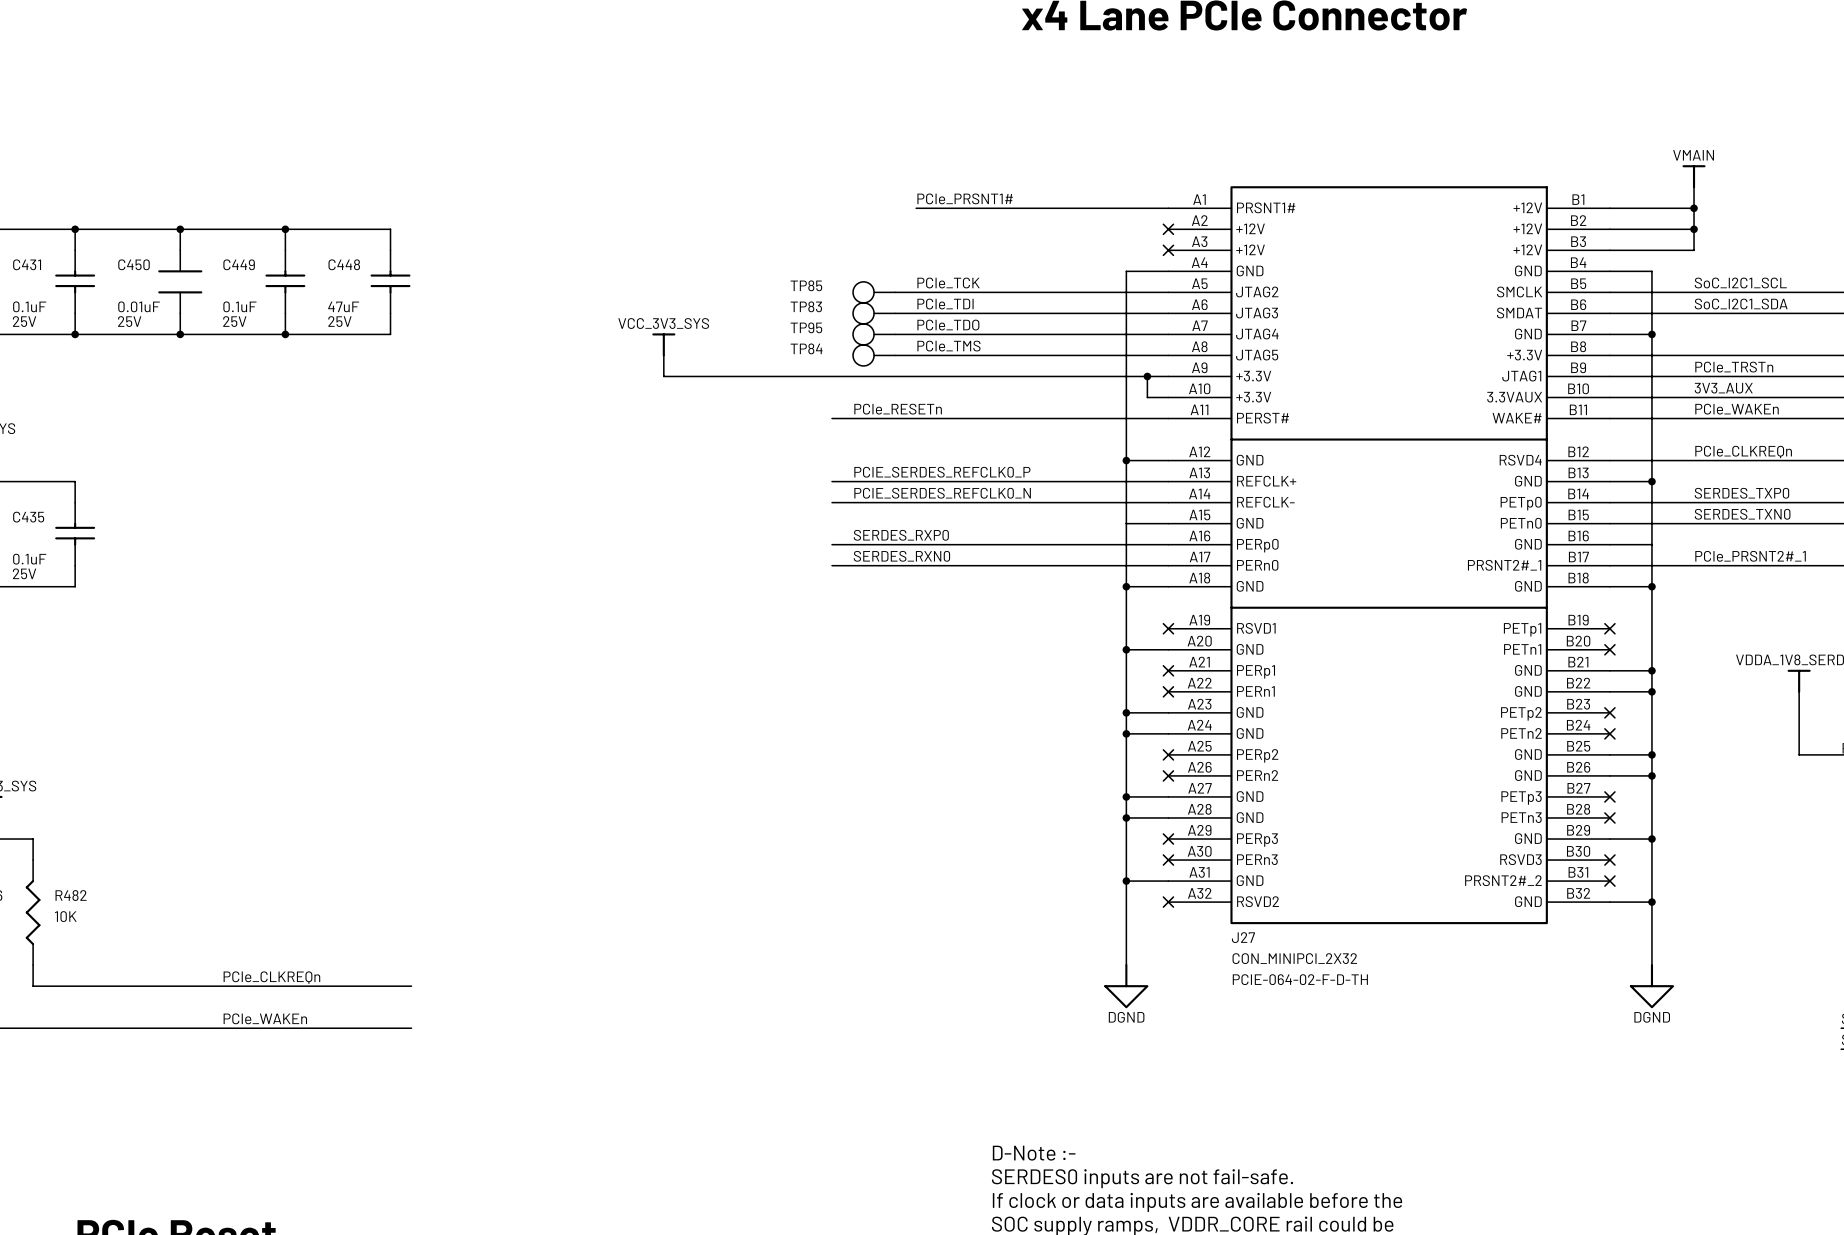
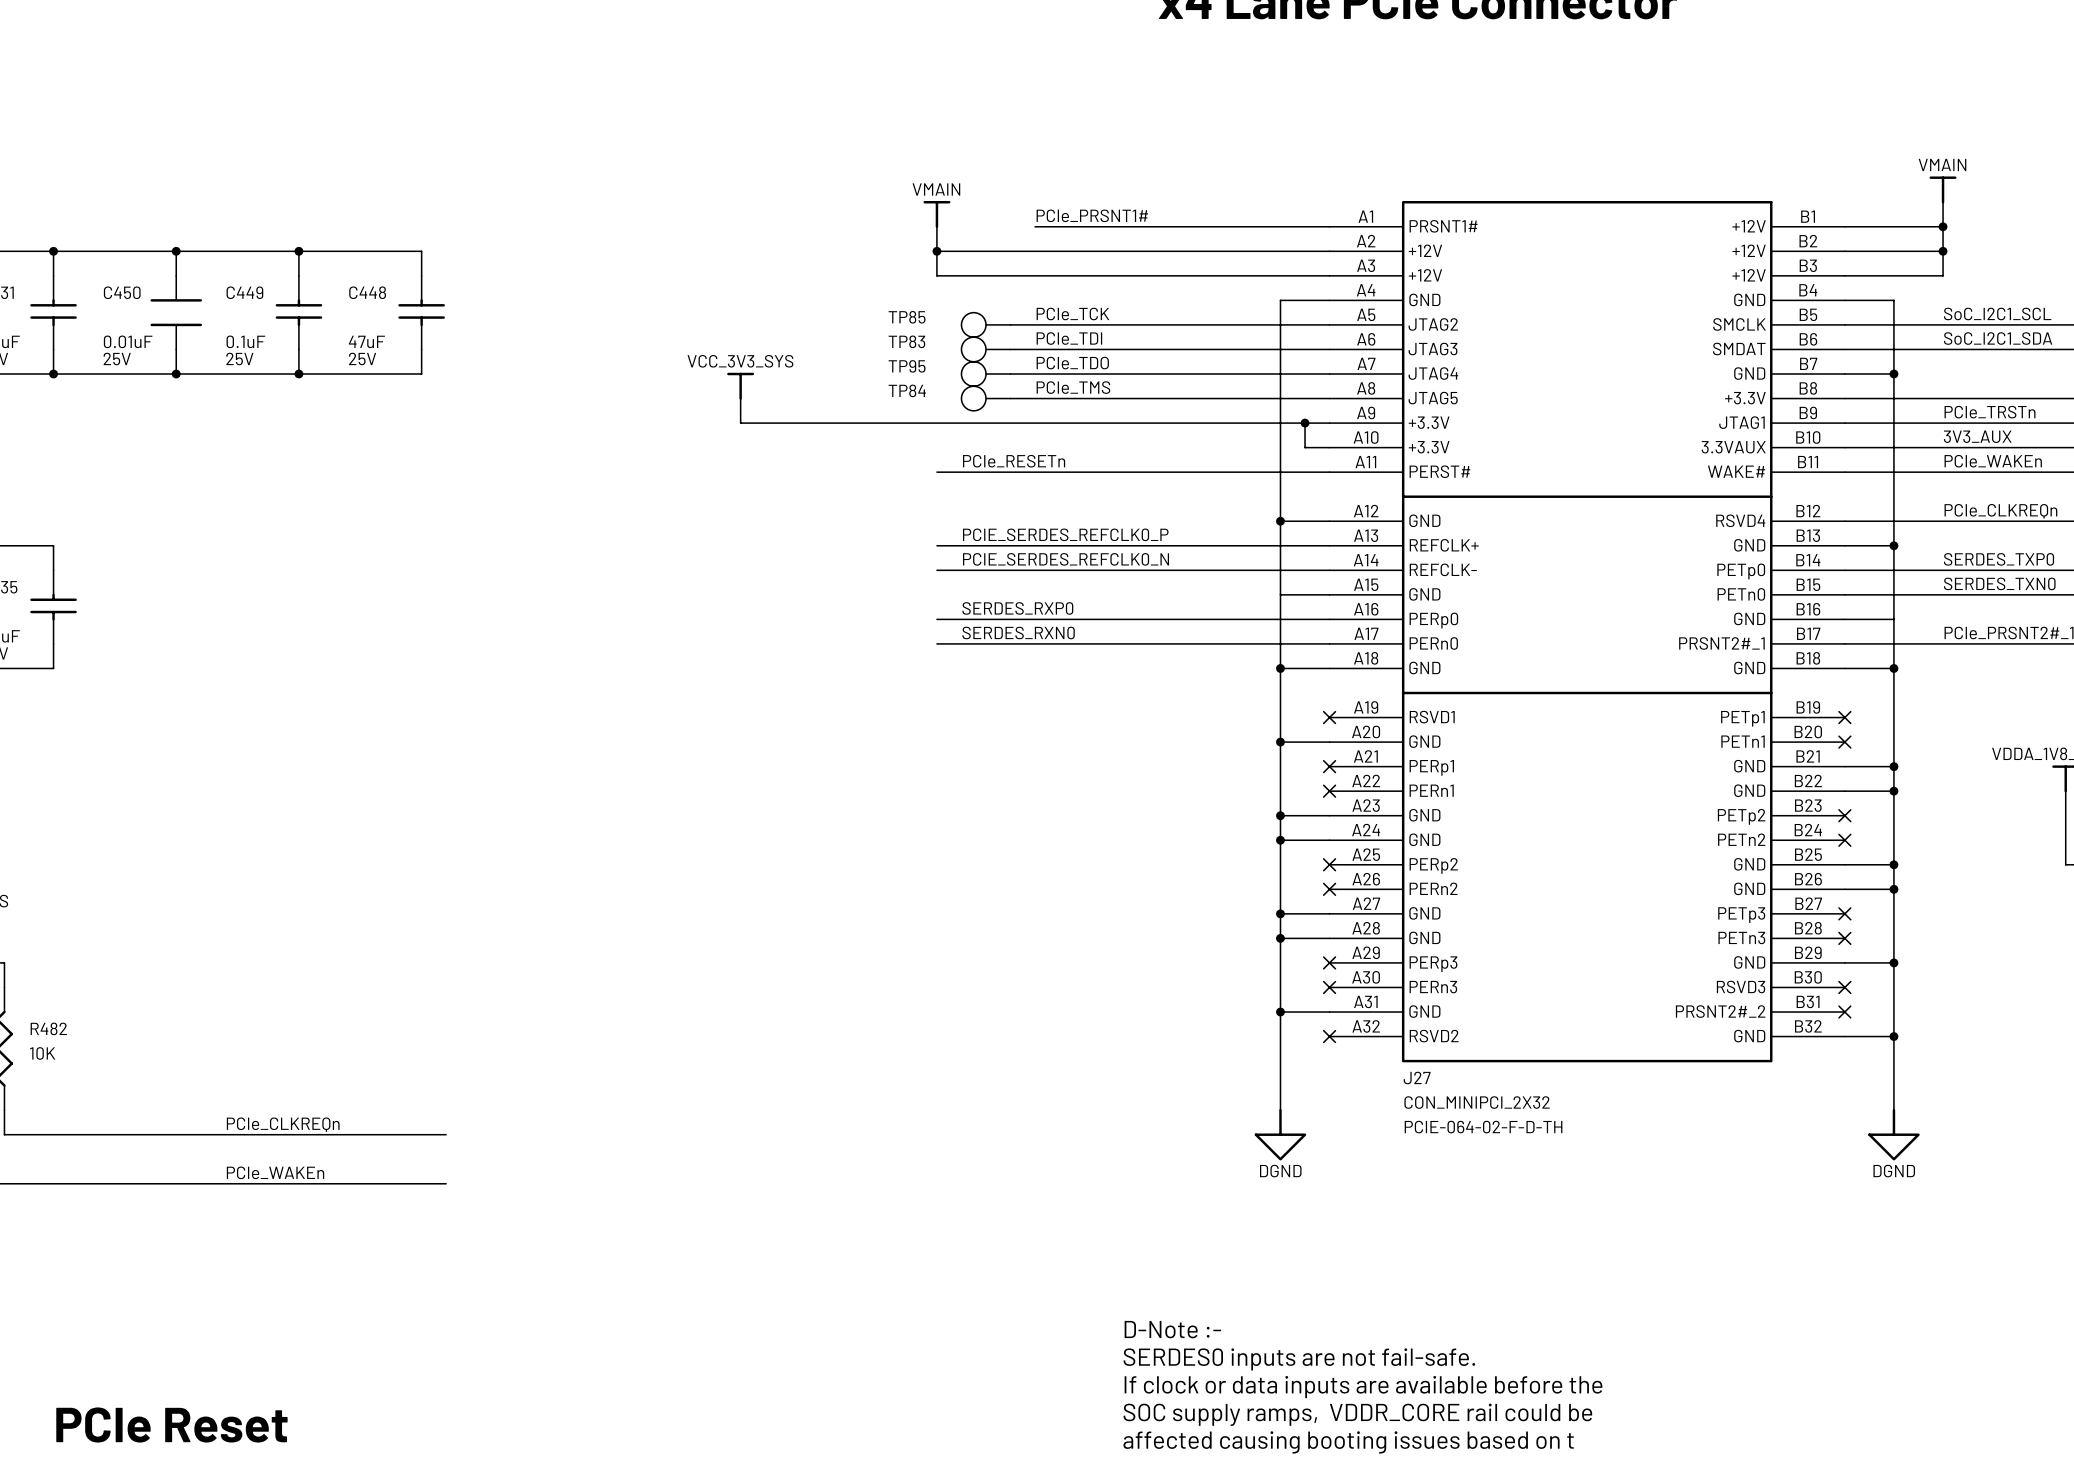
power symbol: none -> VMAIN (936, 214)
wire: none -> (936, 226) (936, 275) (1329, 275)
wire: none -> (936, 251) (1329, 251)
junction: none -> (936, 251)
no-connect mark: (1168, 229) -> none
no-connect mark: (1168, 250) -> none

